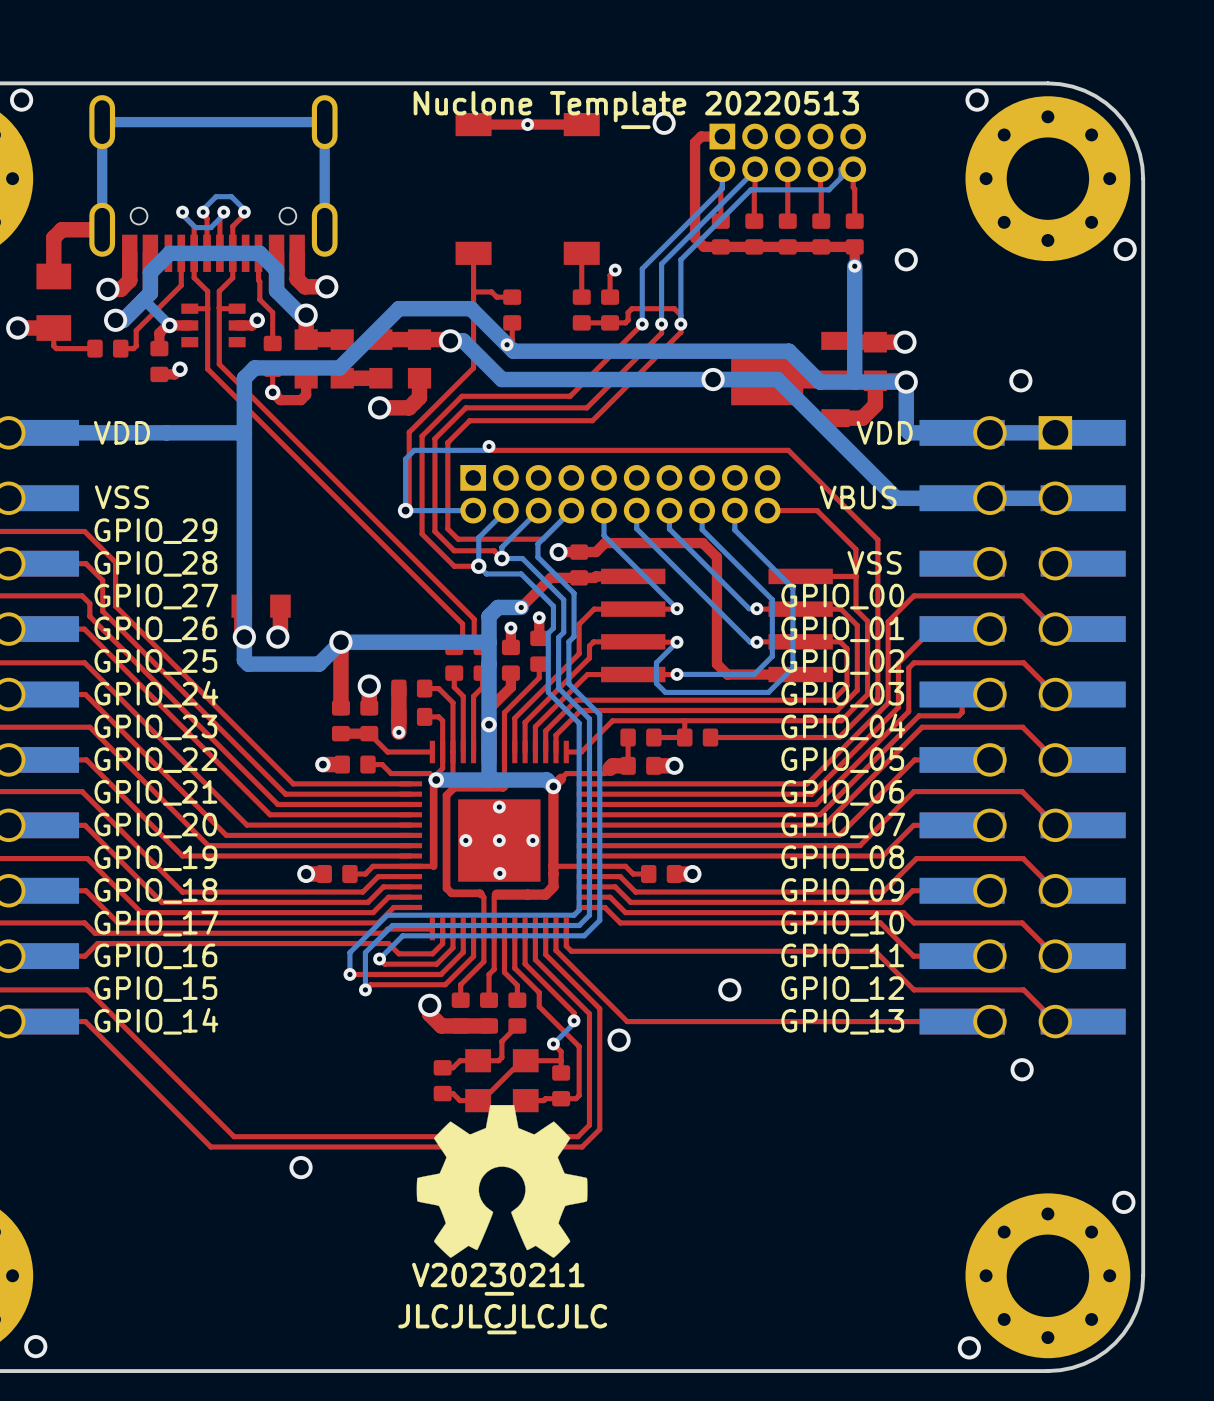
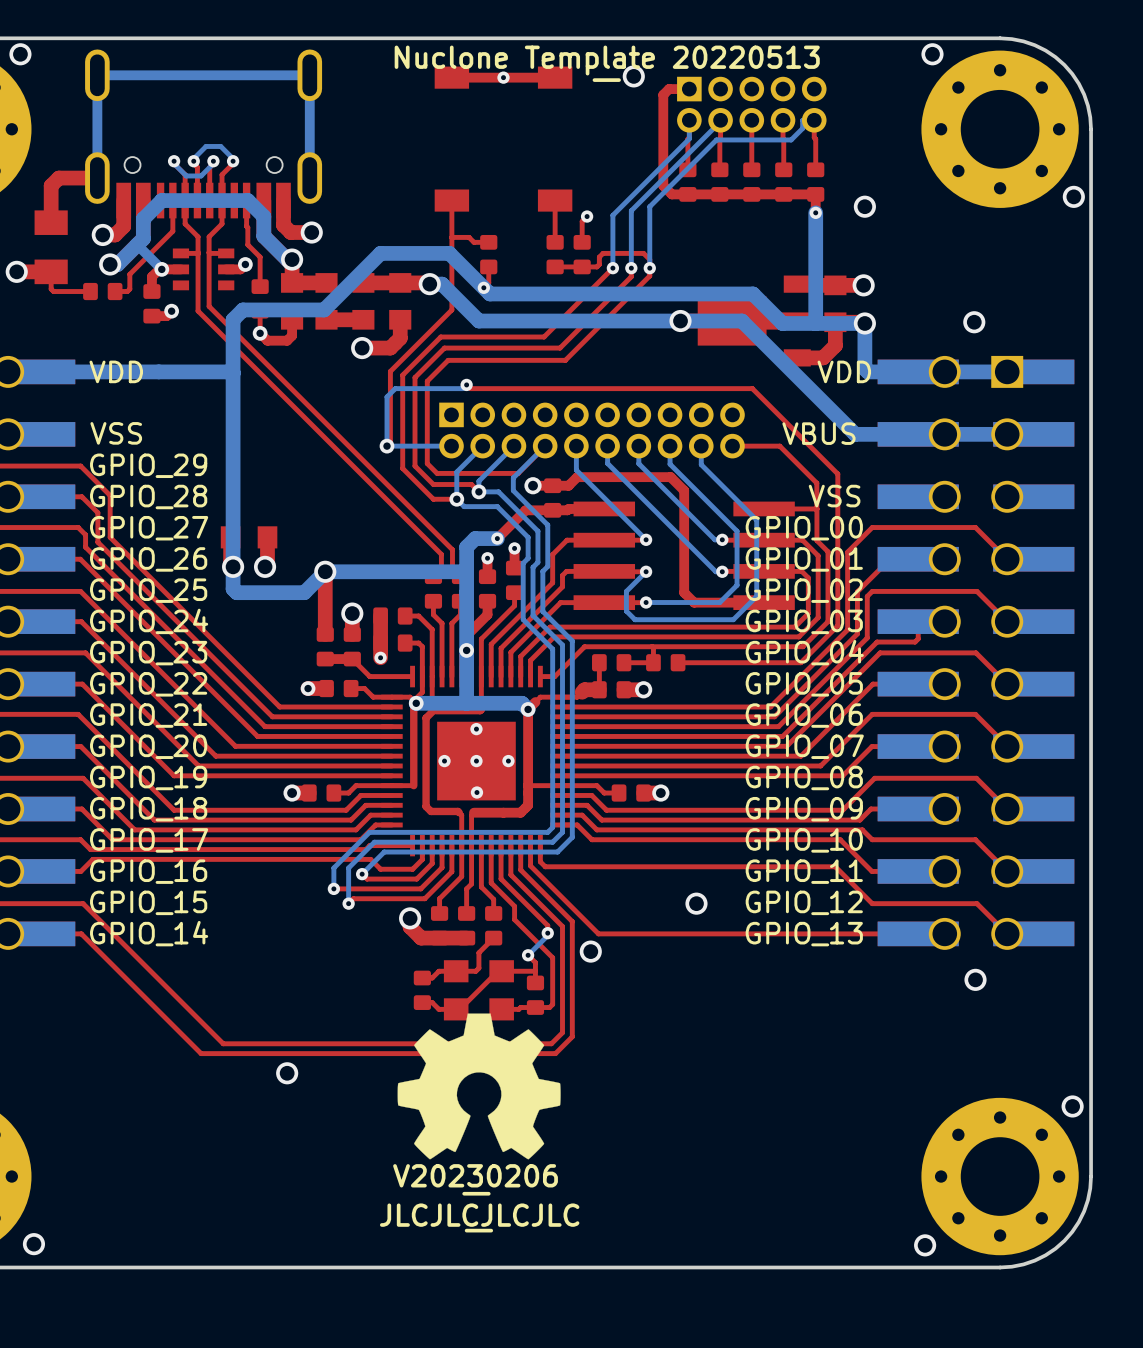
drawing shape: [412, 1262, 585, 1296] -> [393, 1164, 558, 1196]

